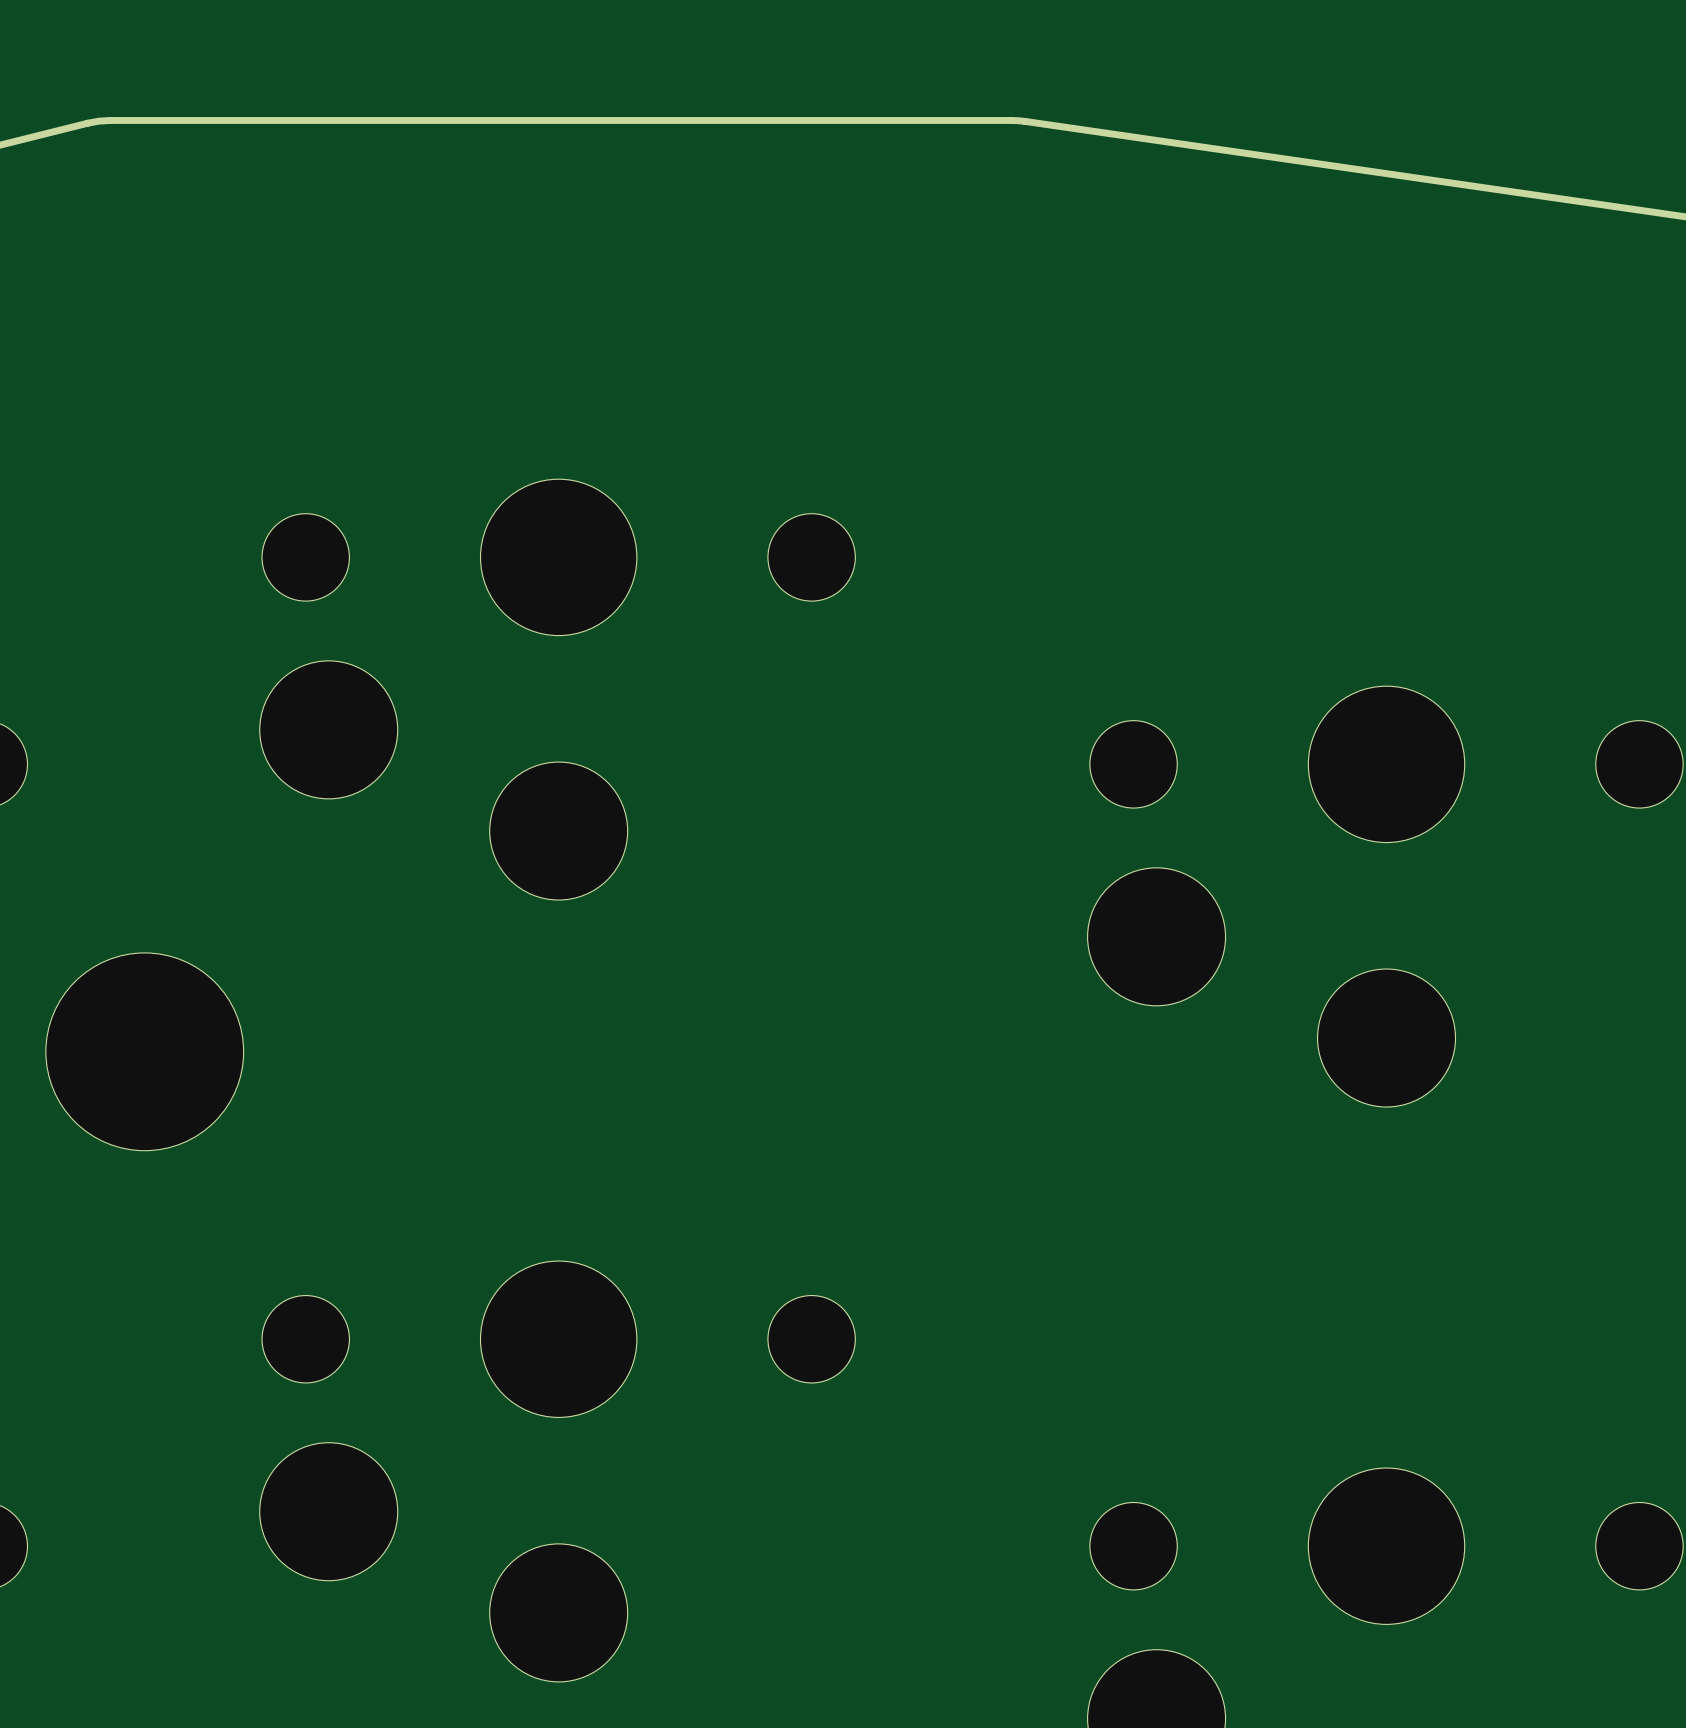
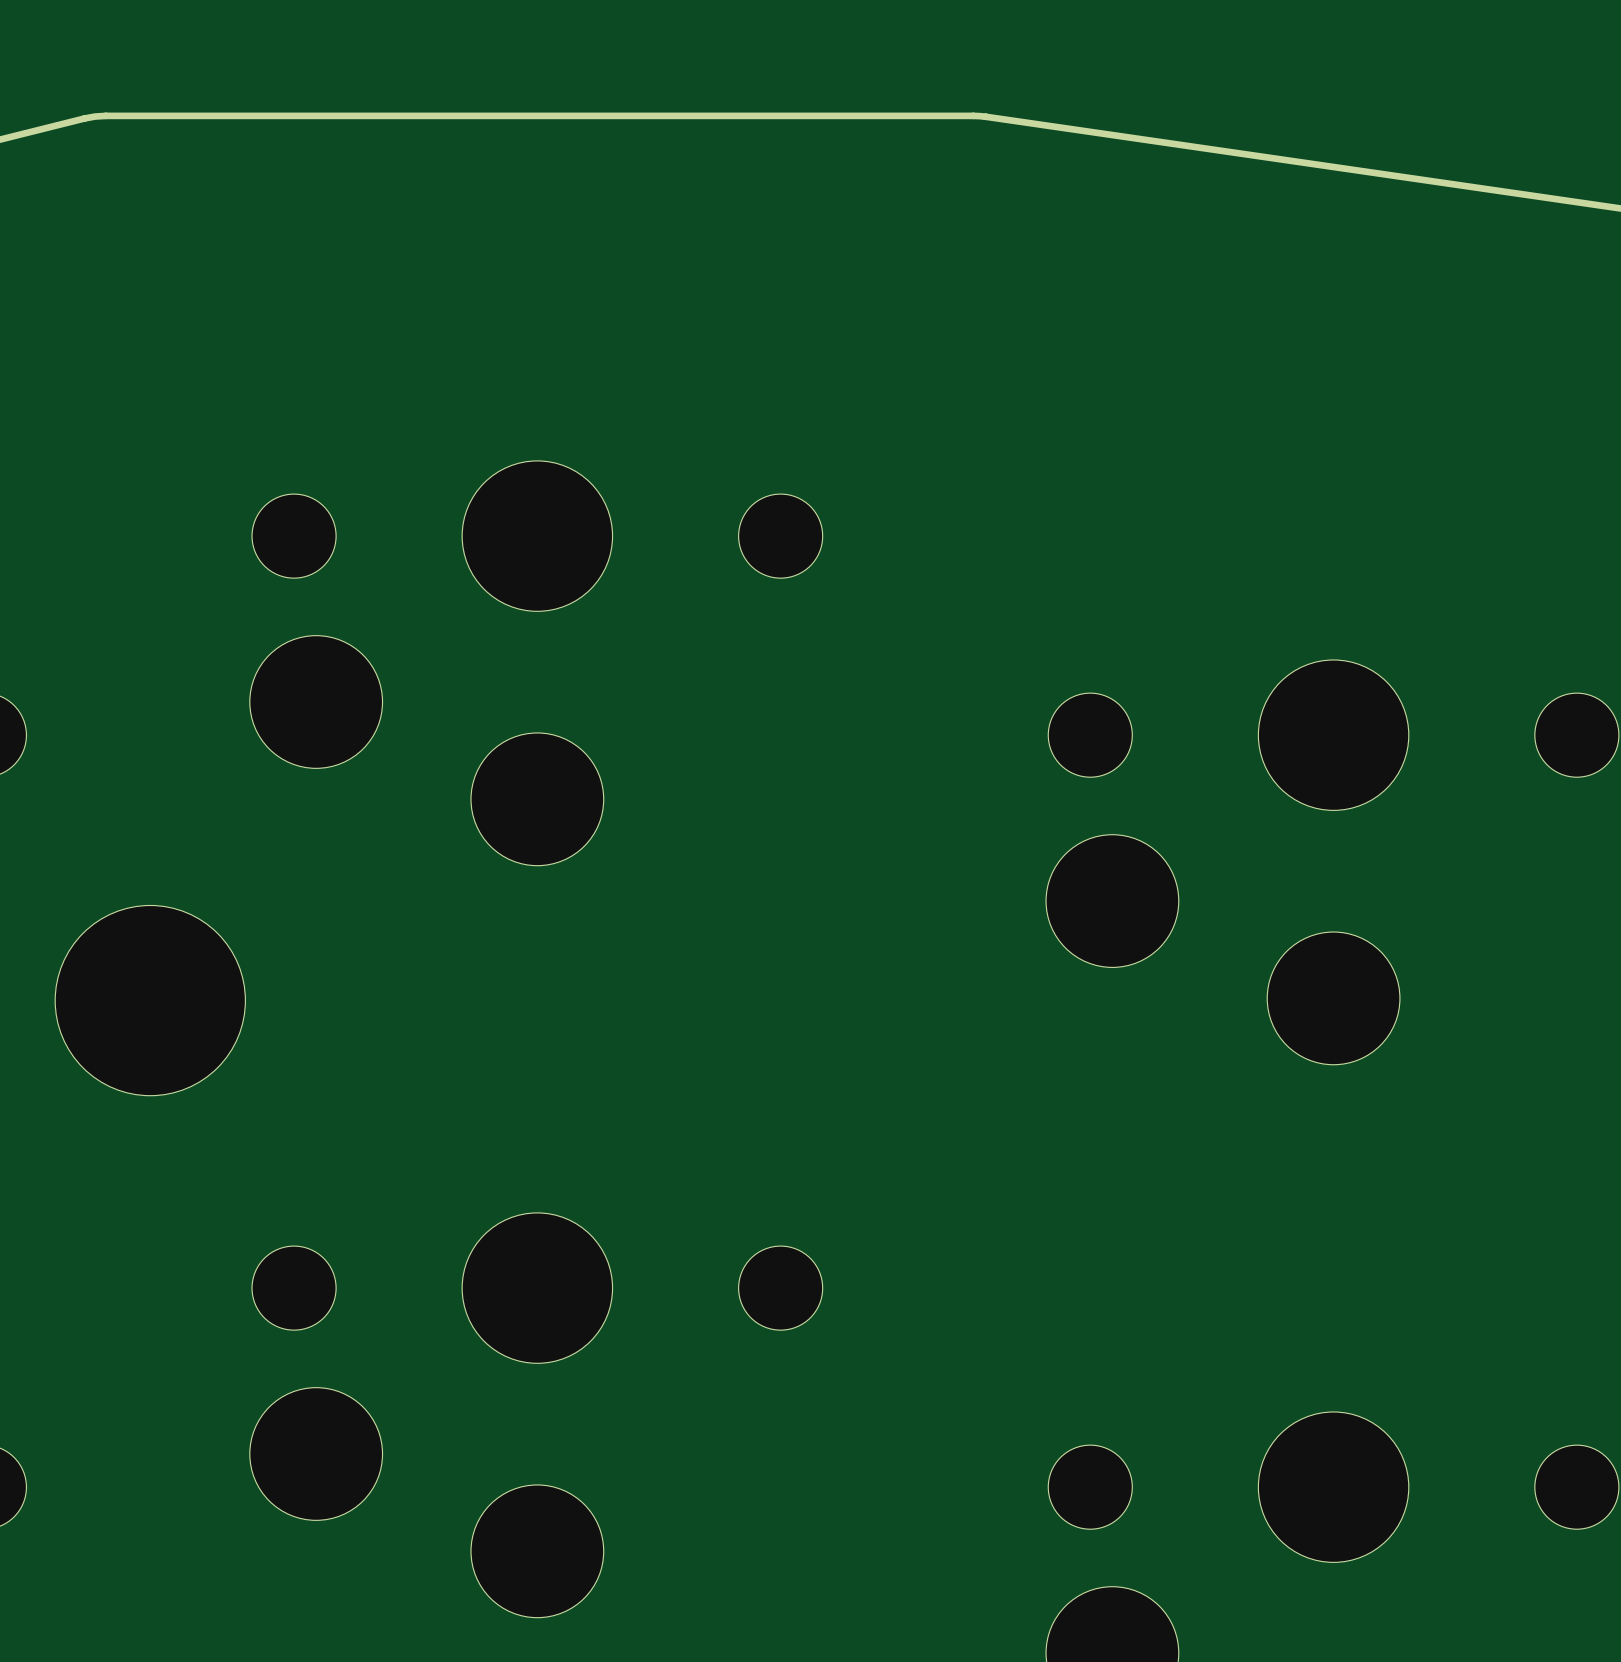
part position: (144, 1051) -> (150, 1000)

